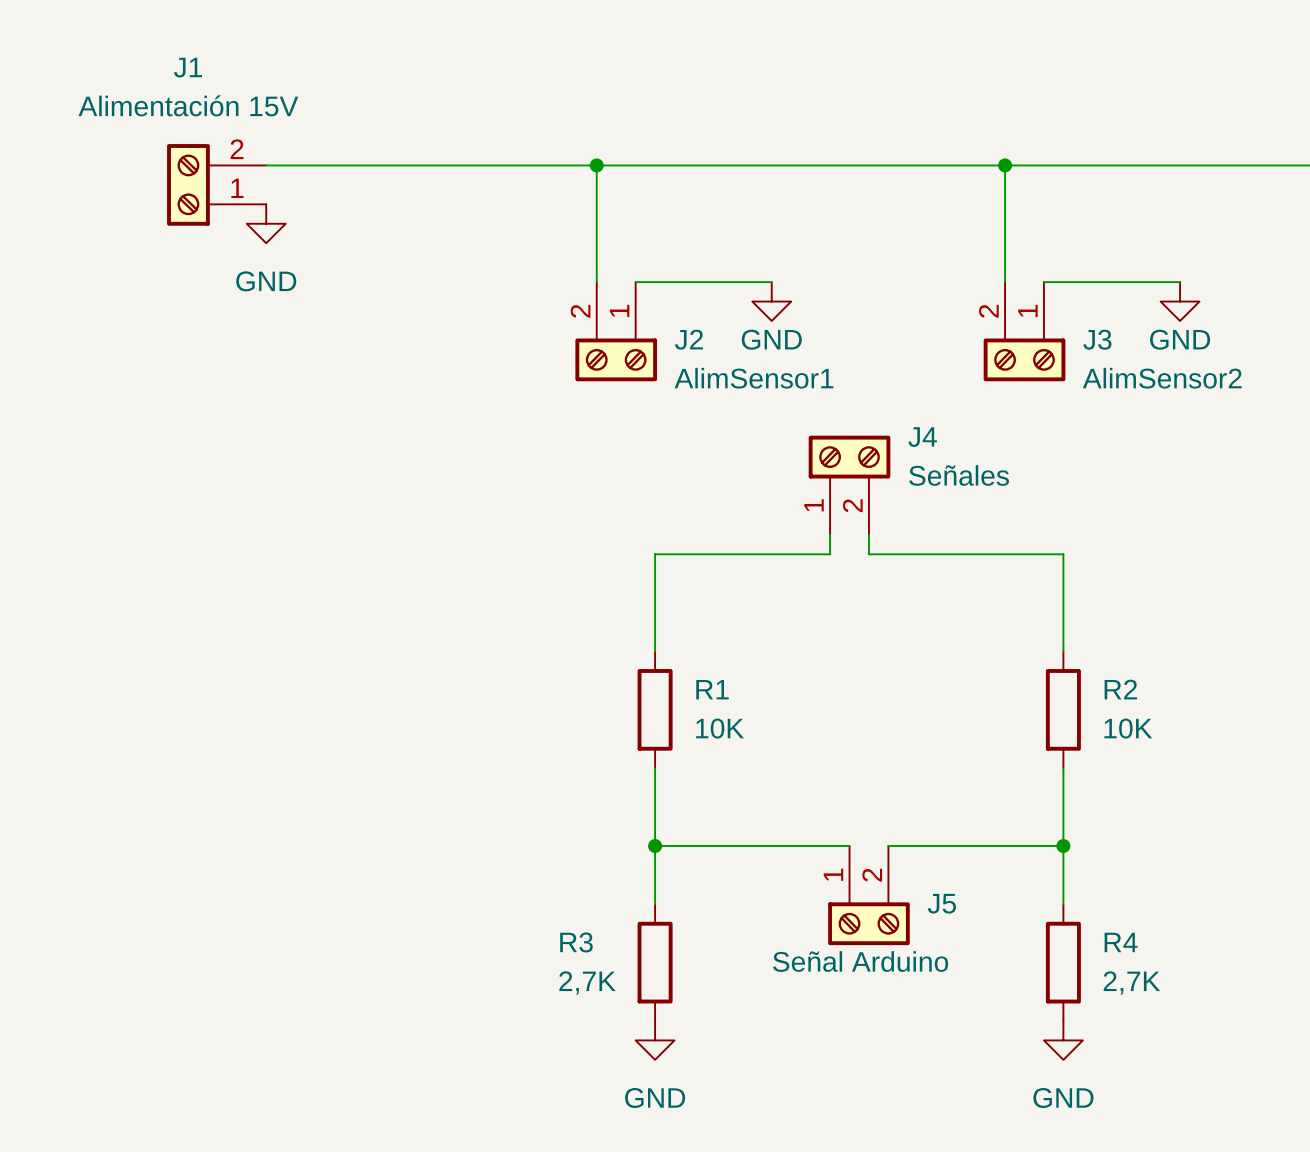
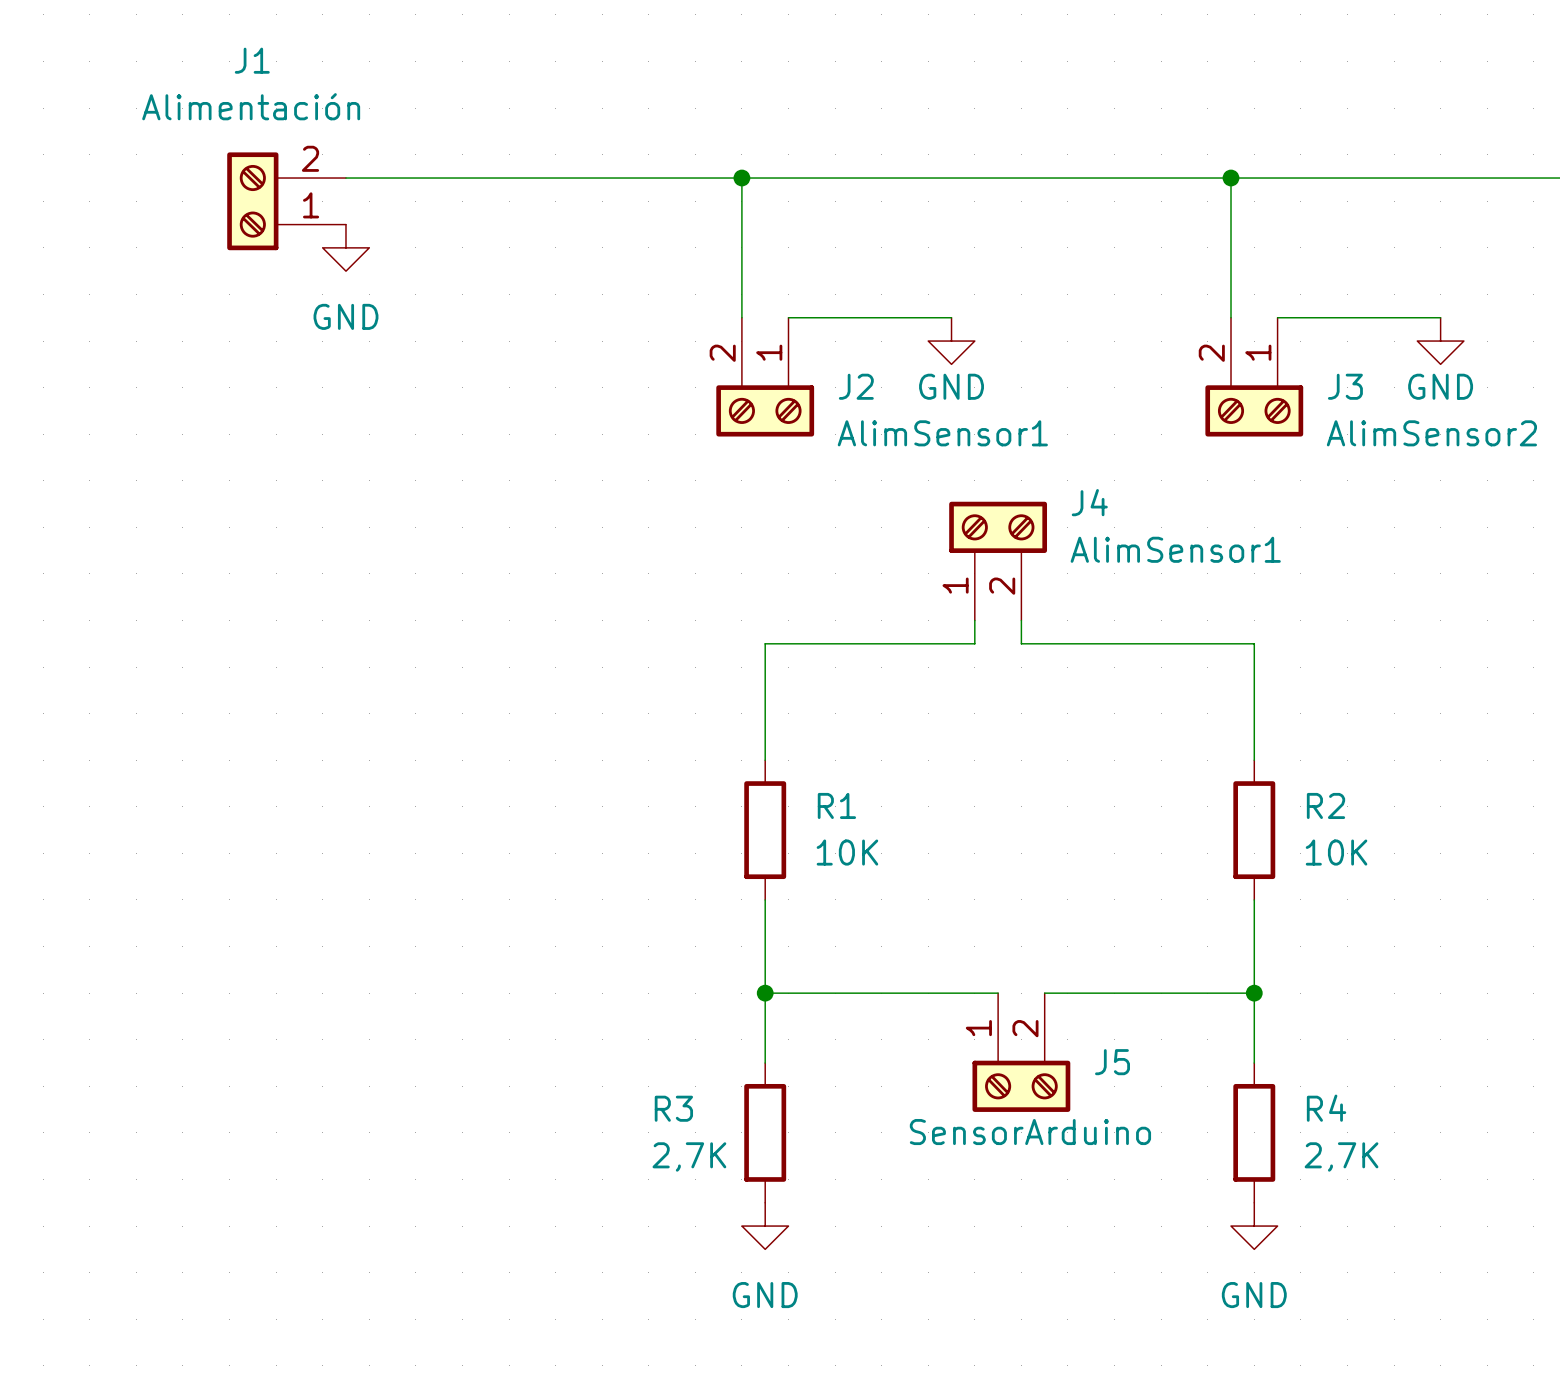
J1 value: Alimentación 15V (188, 105) -> Alimentación (251, 106)
J4 value: Señales (959, 475) -> AlimSensor1 (1175, 549)
J4 position: (849, 485) -> (998, 561)
wire: (868, 534) (868, 554) -> (1021, 643) (1067, 643)
wire: (655, 554) (655, 651) -> (811, 643) (765, 643) (765, 760)
wire: (791, 554) (830, 554) -> (974, 643) (974, 620)
wire: (1024, 554) (1063, 554) (1063, 651) -> (1254, 643) (1254, 760)
R1 position: (655, 709) -> (765, 830)
R2 position: (1063, 709) -> (1254, 830)
wire: (655, 768) (655, 904) -> (765, 899) (765, 1063)
wire: (1063, 768) (1063, 904) -> (1254, 899) (1254, 1063)
wire: none -> (765, 993) (811, 993)
junction position: (655, 845) -> (765, 993)
wire: (810, 845) (849, 845) -> (1091, 993) (1044, 993)
wire: (1024, 845) (1063, 845) -> none
junction position: (1063, 845) -> (1254, 993)
J5 position: (868, 895) -> (1021, 1052)
J5 value: Señal Arduino (860, 961) -> SensorArduino (1030, 1132)
R3 position: (655, 962) -> (765, 1132)
R4 position: (1063, 962) -> (1254, 1132)
power symbol position: GND (655, 1040) -> GND (765, 1226)
power symbol position: GND (1063, 1040) -> GND (1254, 1226)

